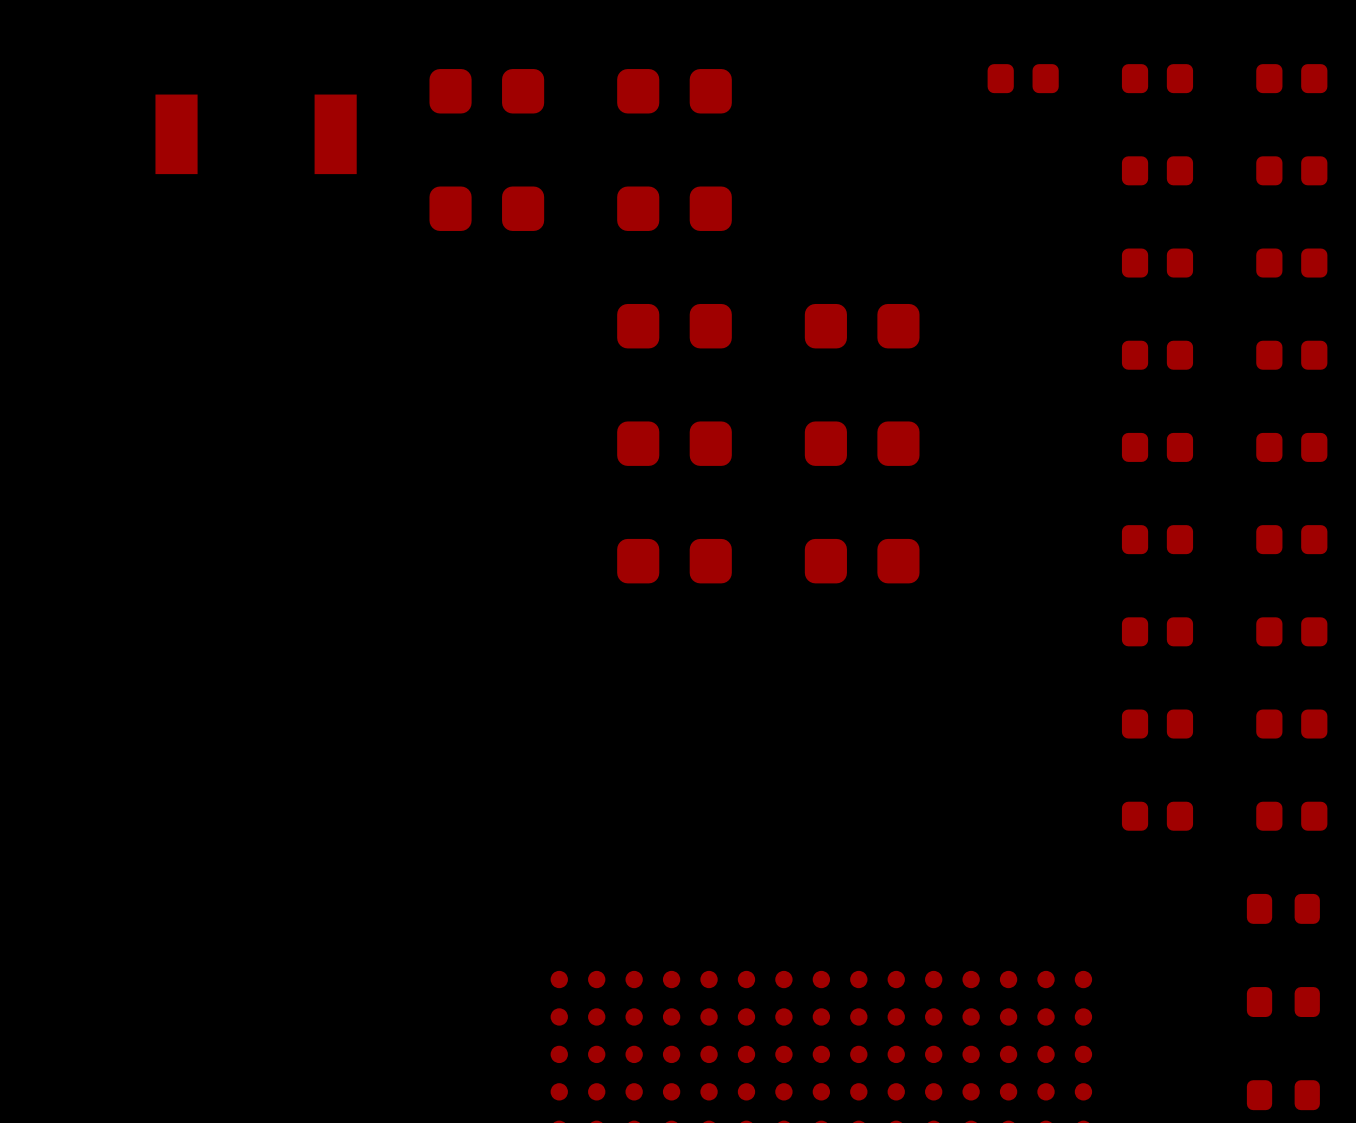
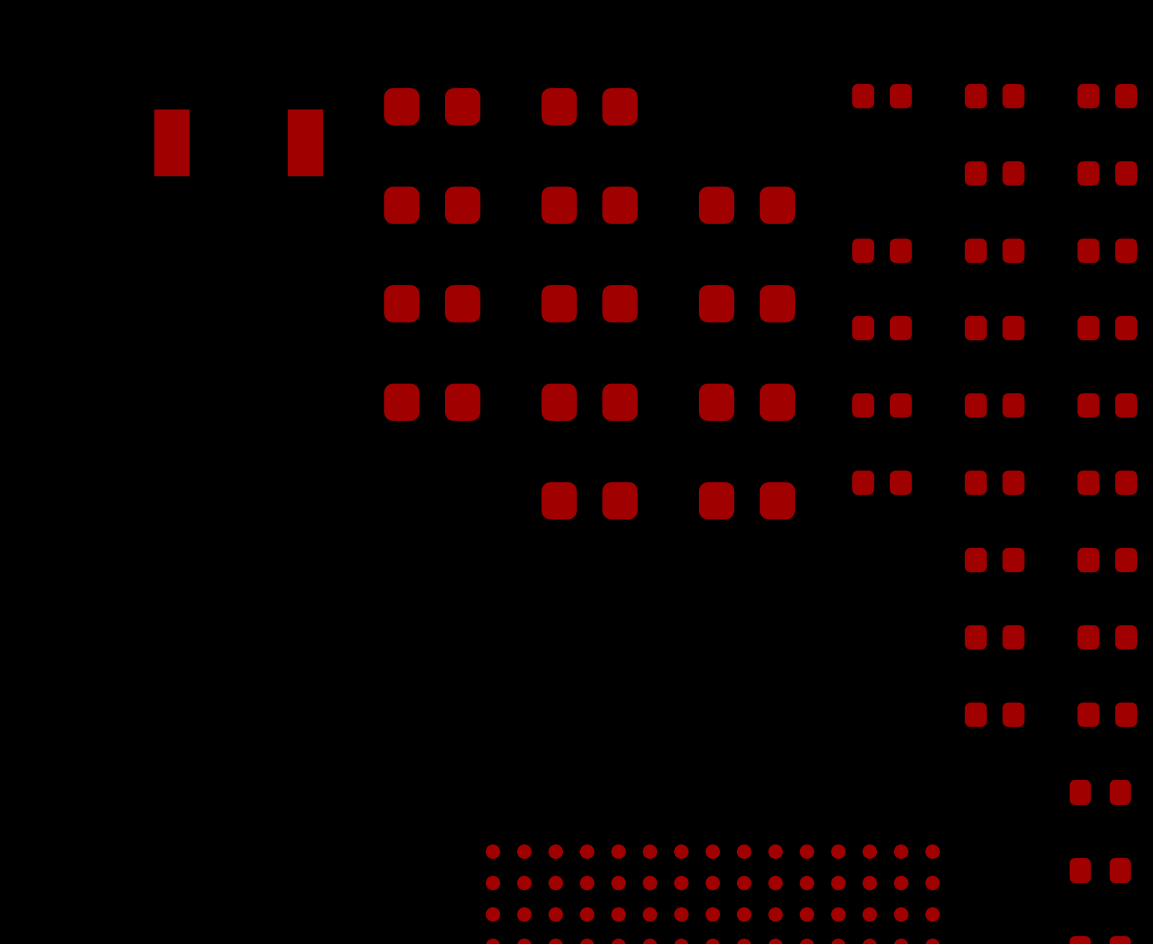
part: none -> (746, 205)
part: none -> (882, 250)
part: none -> (432, 303)
part: none -> (882, 328)
part: none -> (432, 402)
part: none -> (882, 405)
part: none -> (882, 482)

